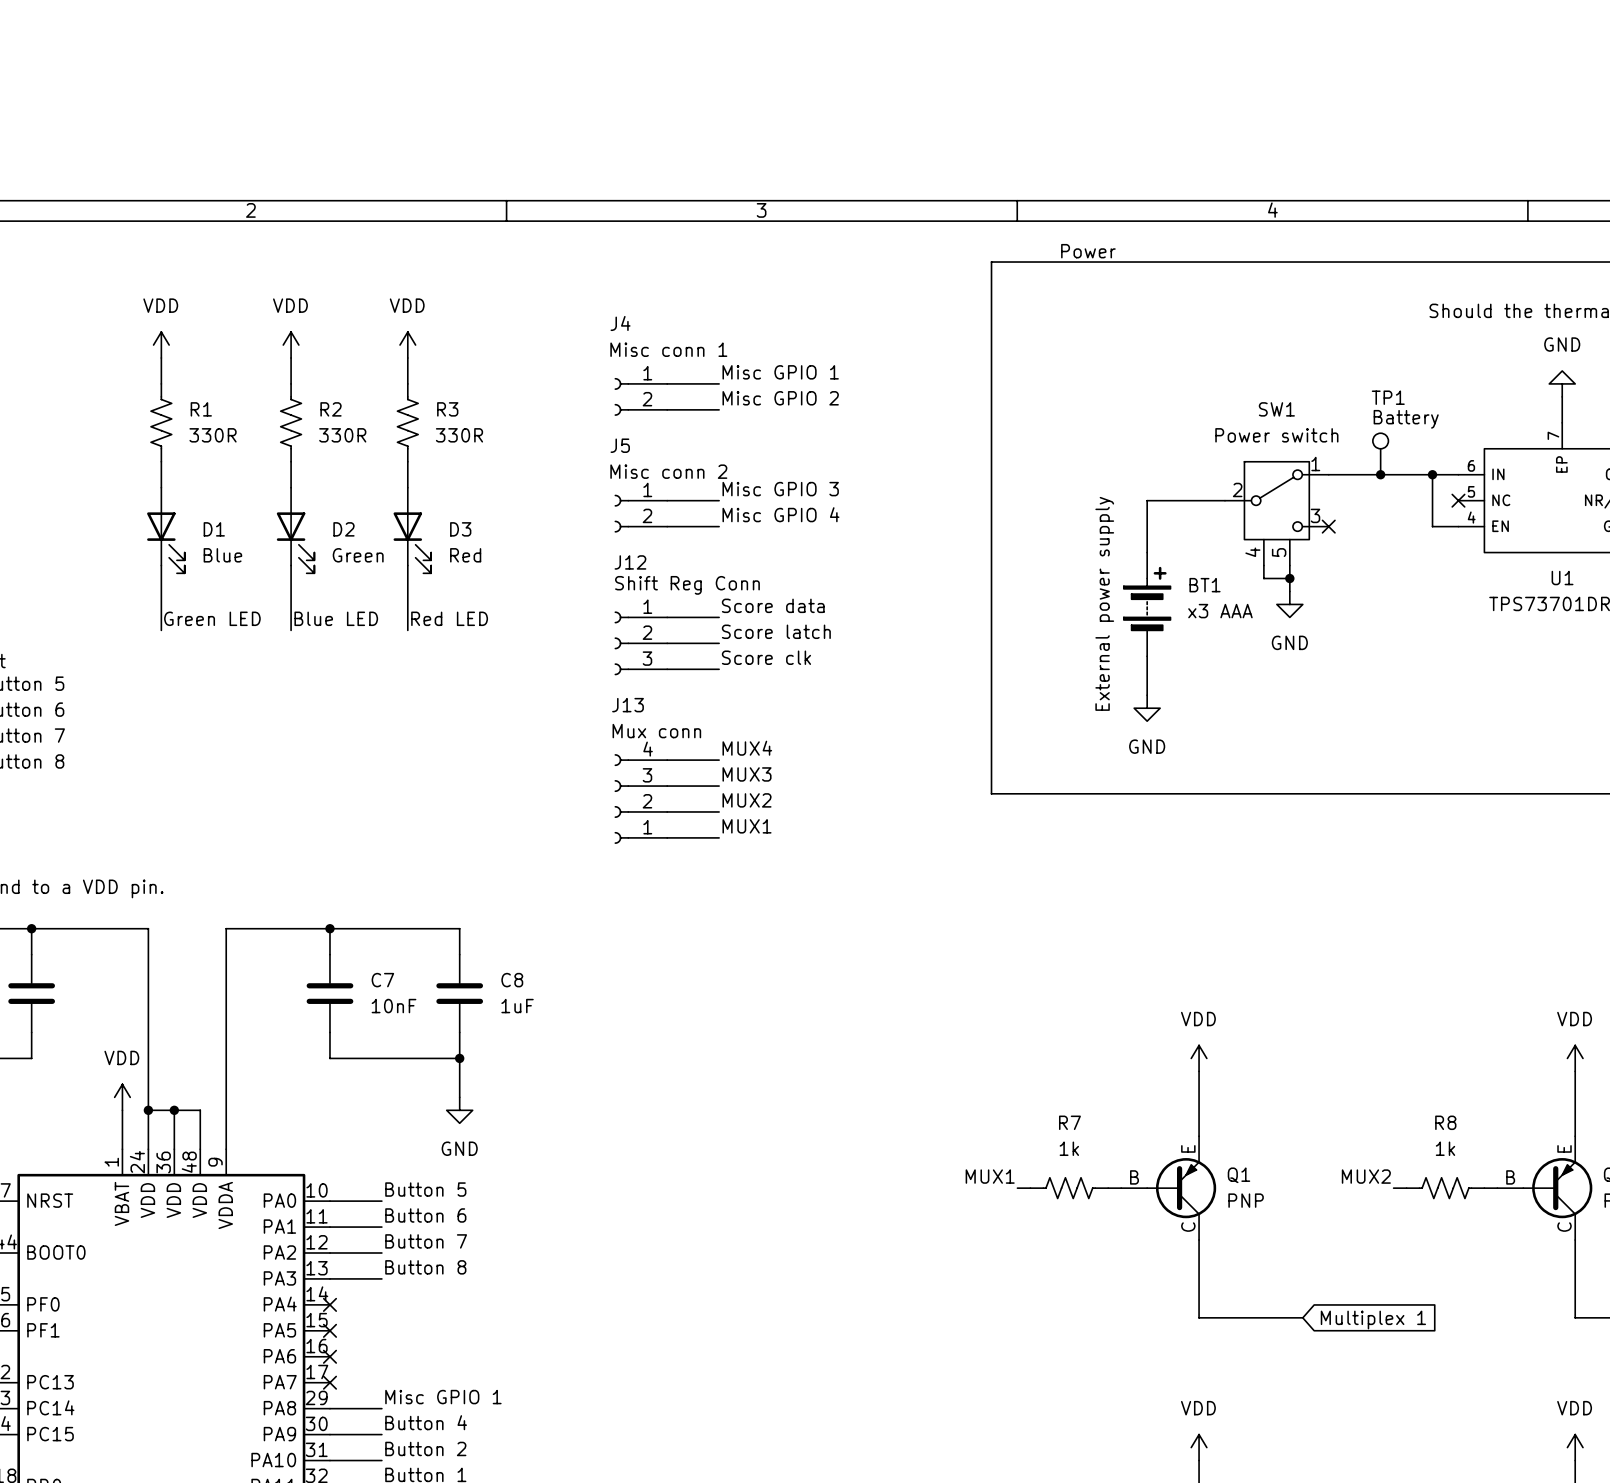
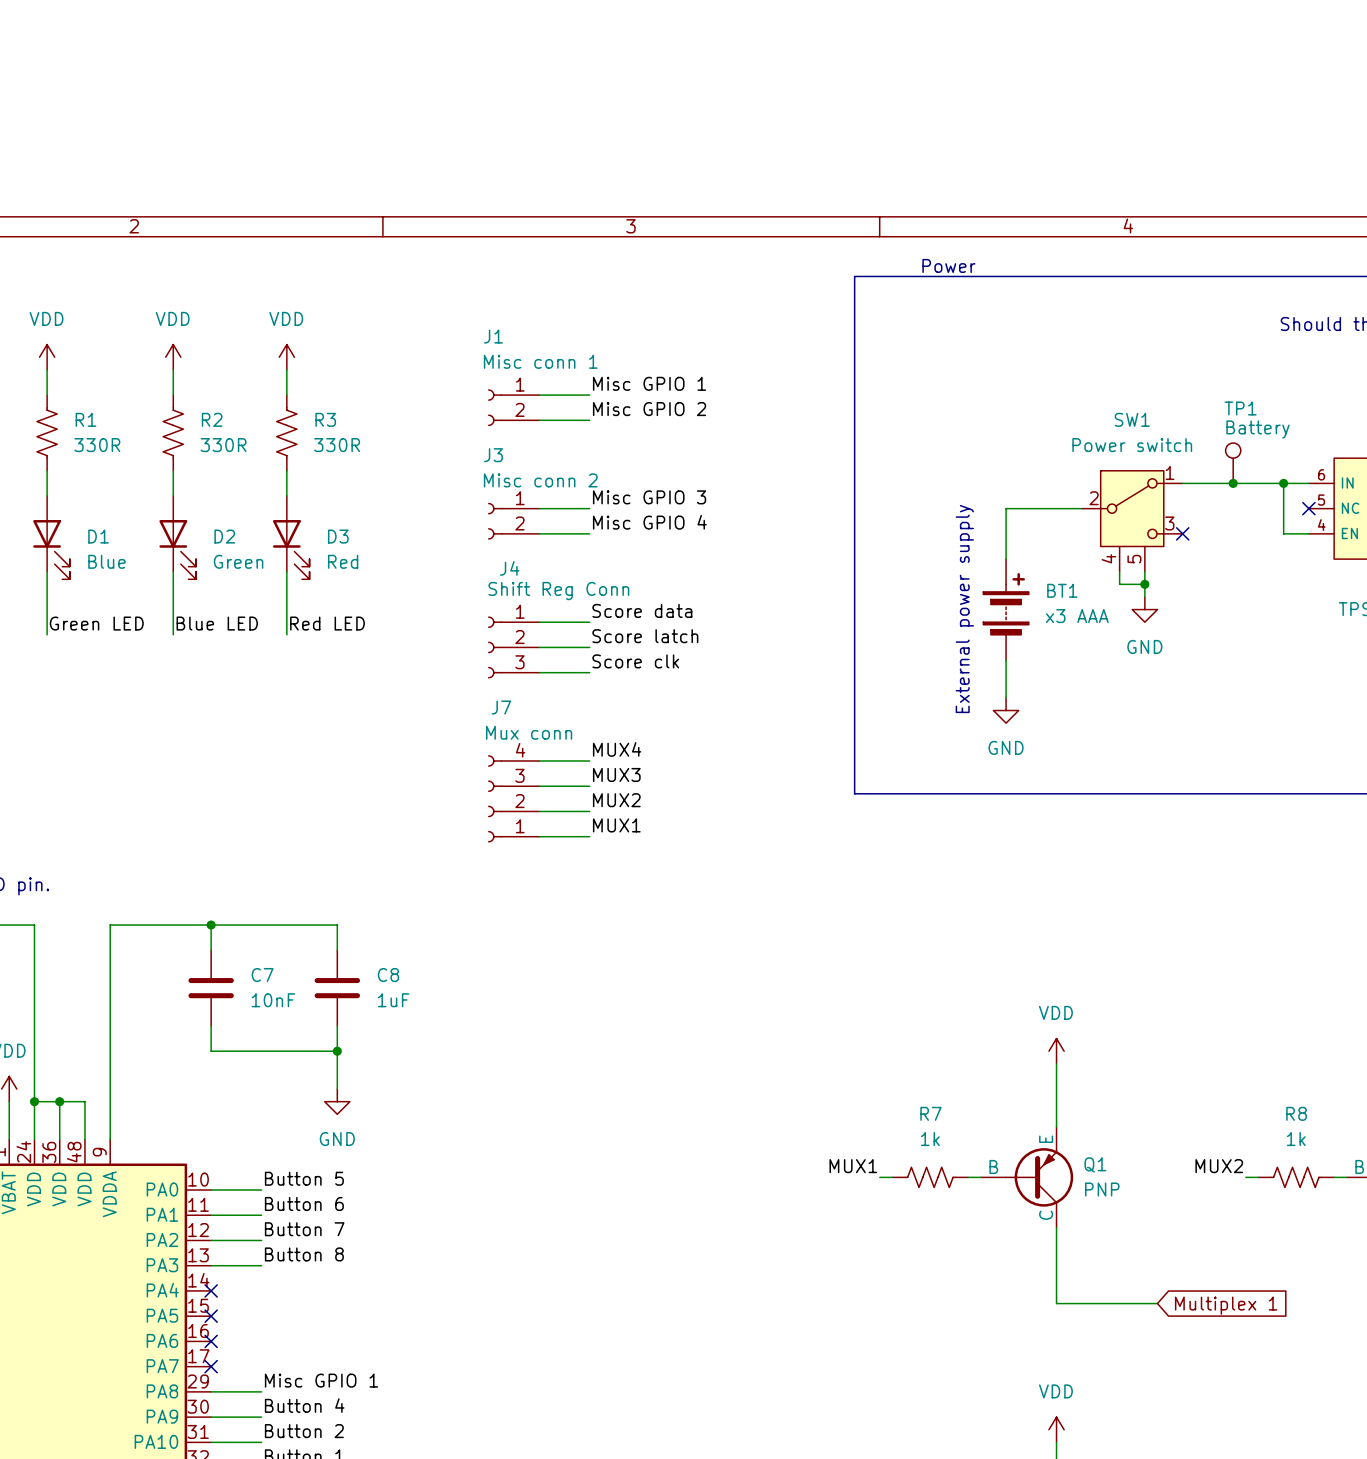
J4 name: J4 (620, 323) -> J1 (493, 336)
J5 name: J5 (620, 445) -> J3 (493, 455)
J12 name: J12 (630, 562) -> J4 (509, 568)
J13 name: J13 (628, 705) -> J7 (501, 707)

